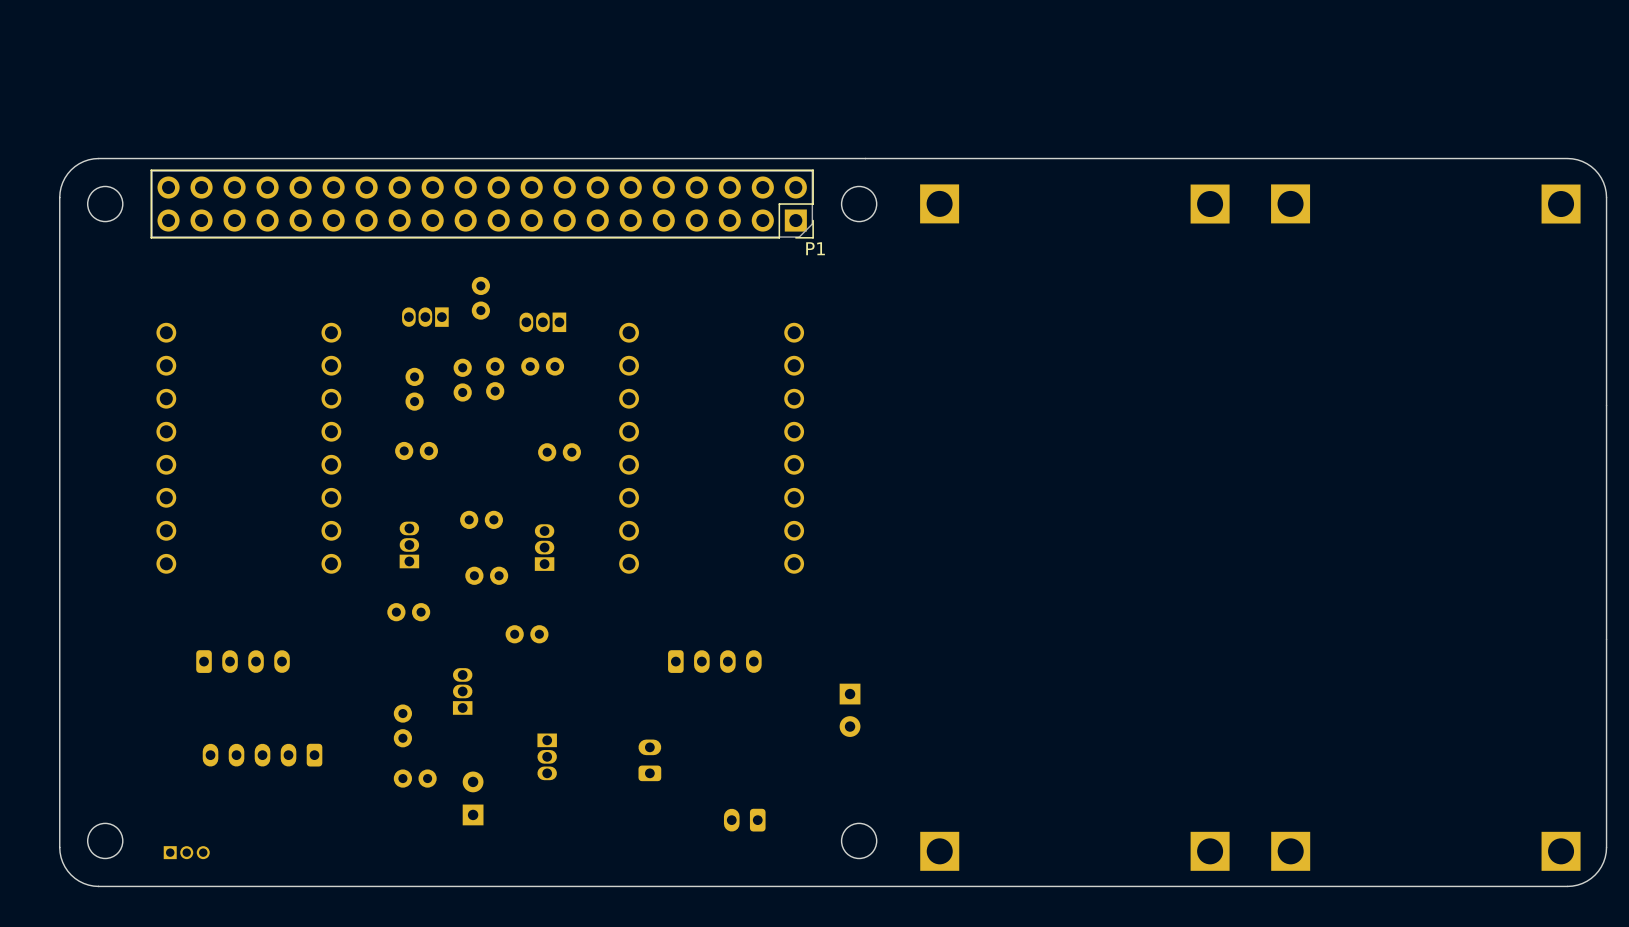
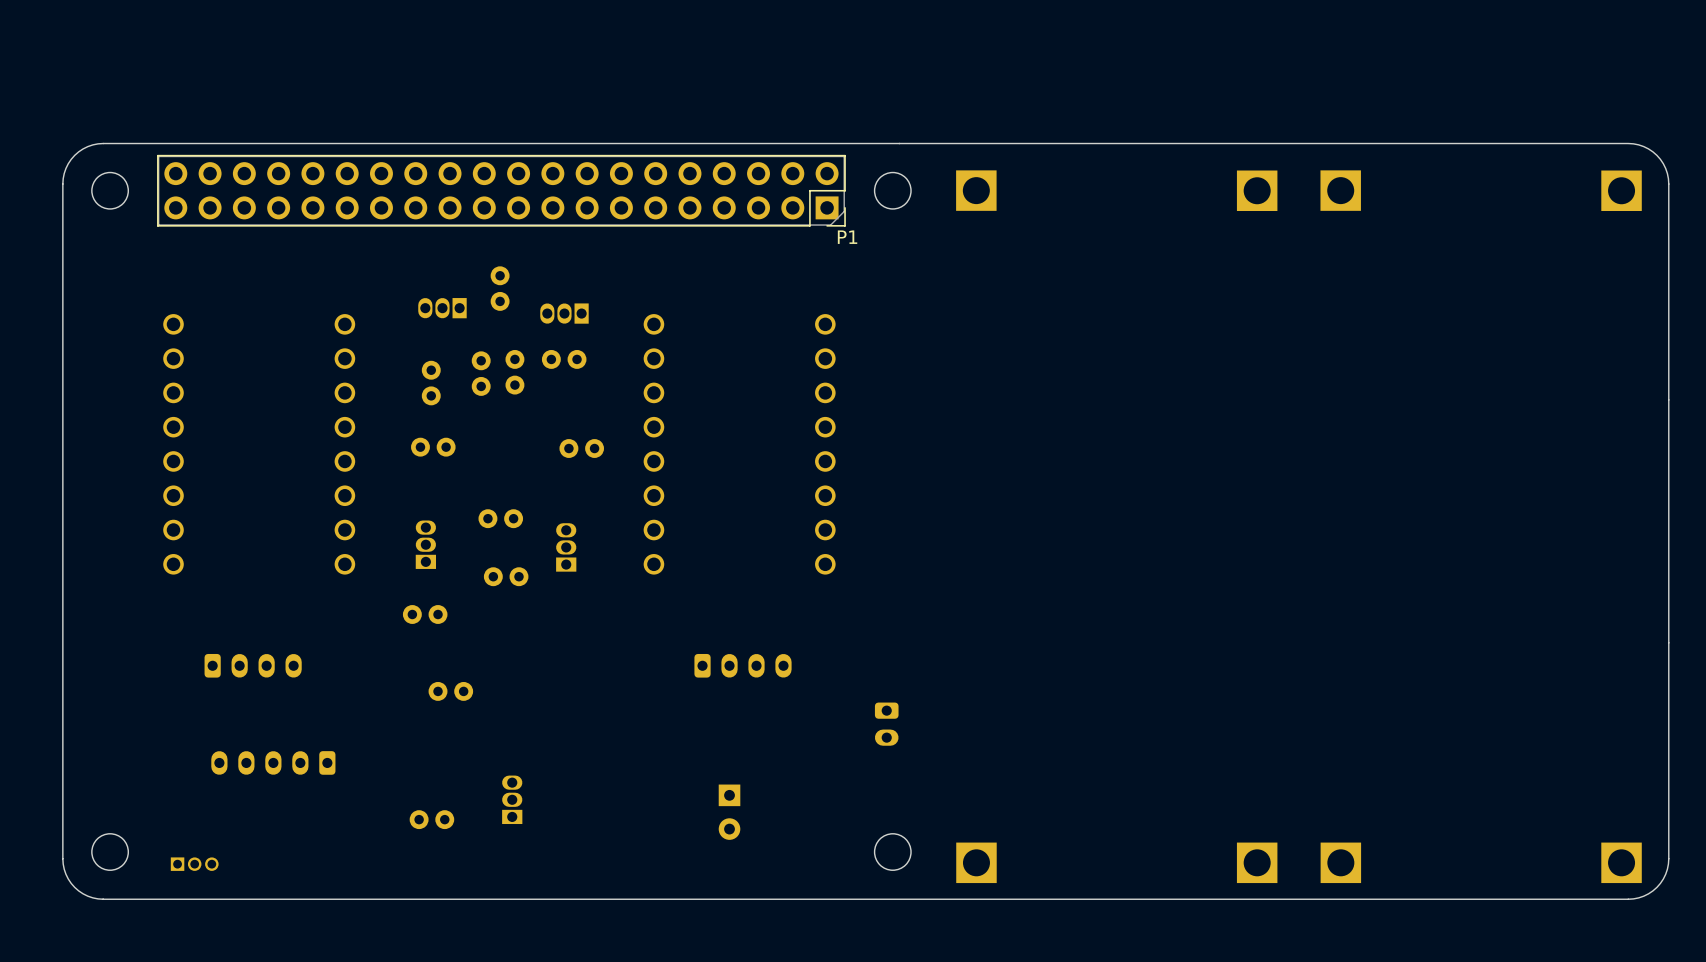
part: (527, 634) -> none
part footprint: [839, 683, 861, 737] -> [874, 702, 899, 746]
part: none -> (450, 691)
part: (462, 691) -> none
part: (402, 725) -> none
part: (547, 756) -> none
part: (649, 760) -> none
part position: (415, 778) -> (431, 819)
part: none -> (512, 799)
part: (473, 798) -> none
part: none -> (729, 812)
part: (744, 820) -> none

